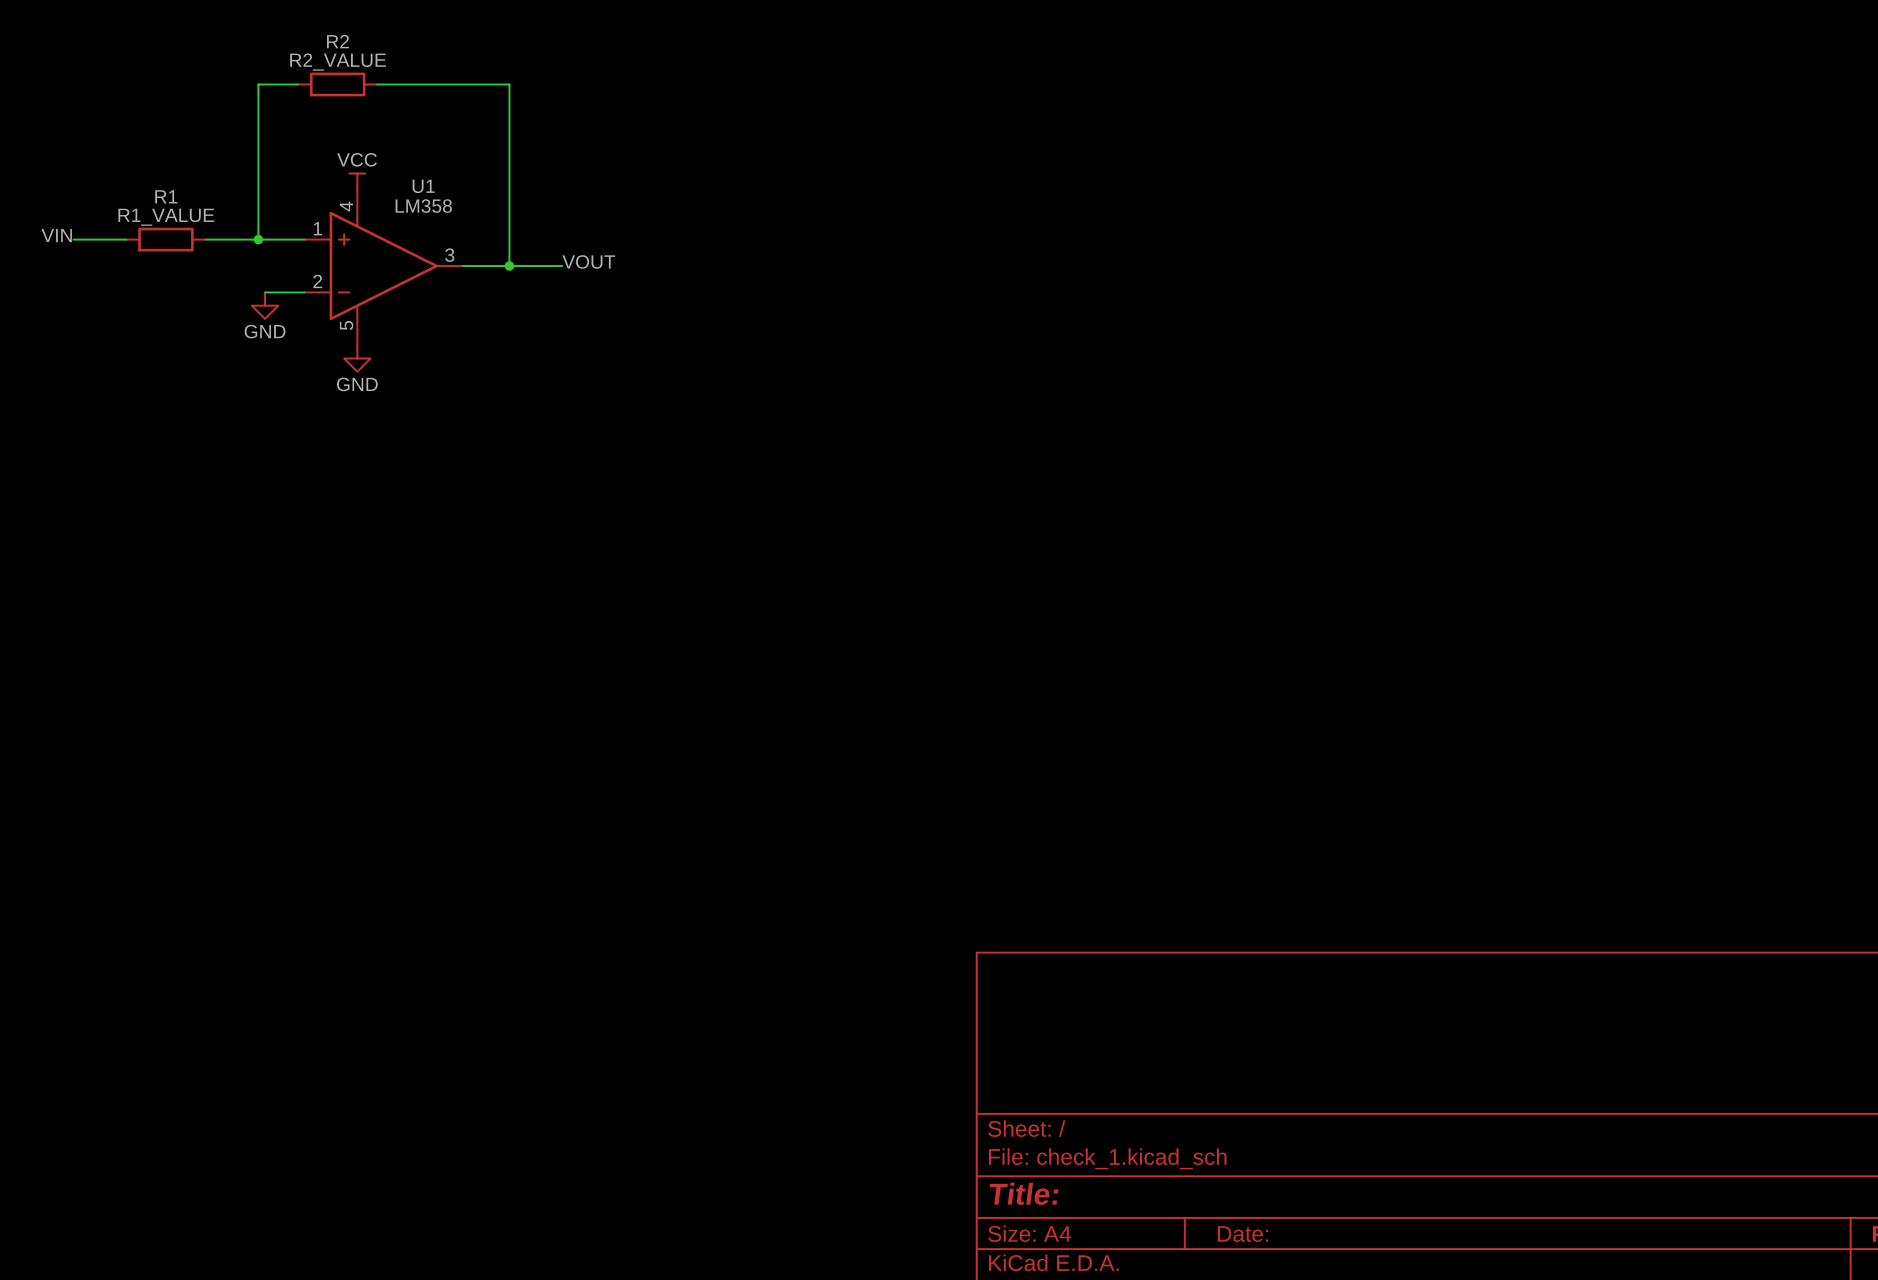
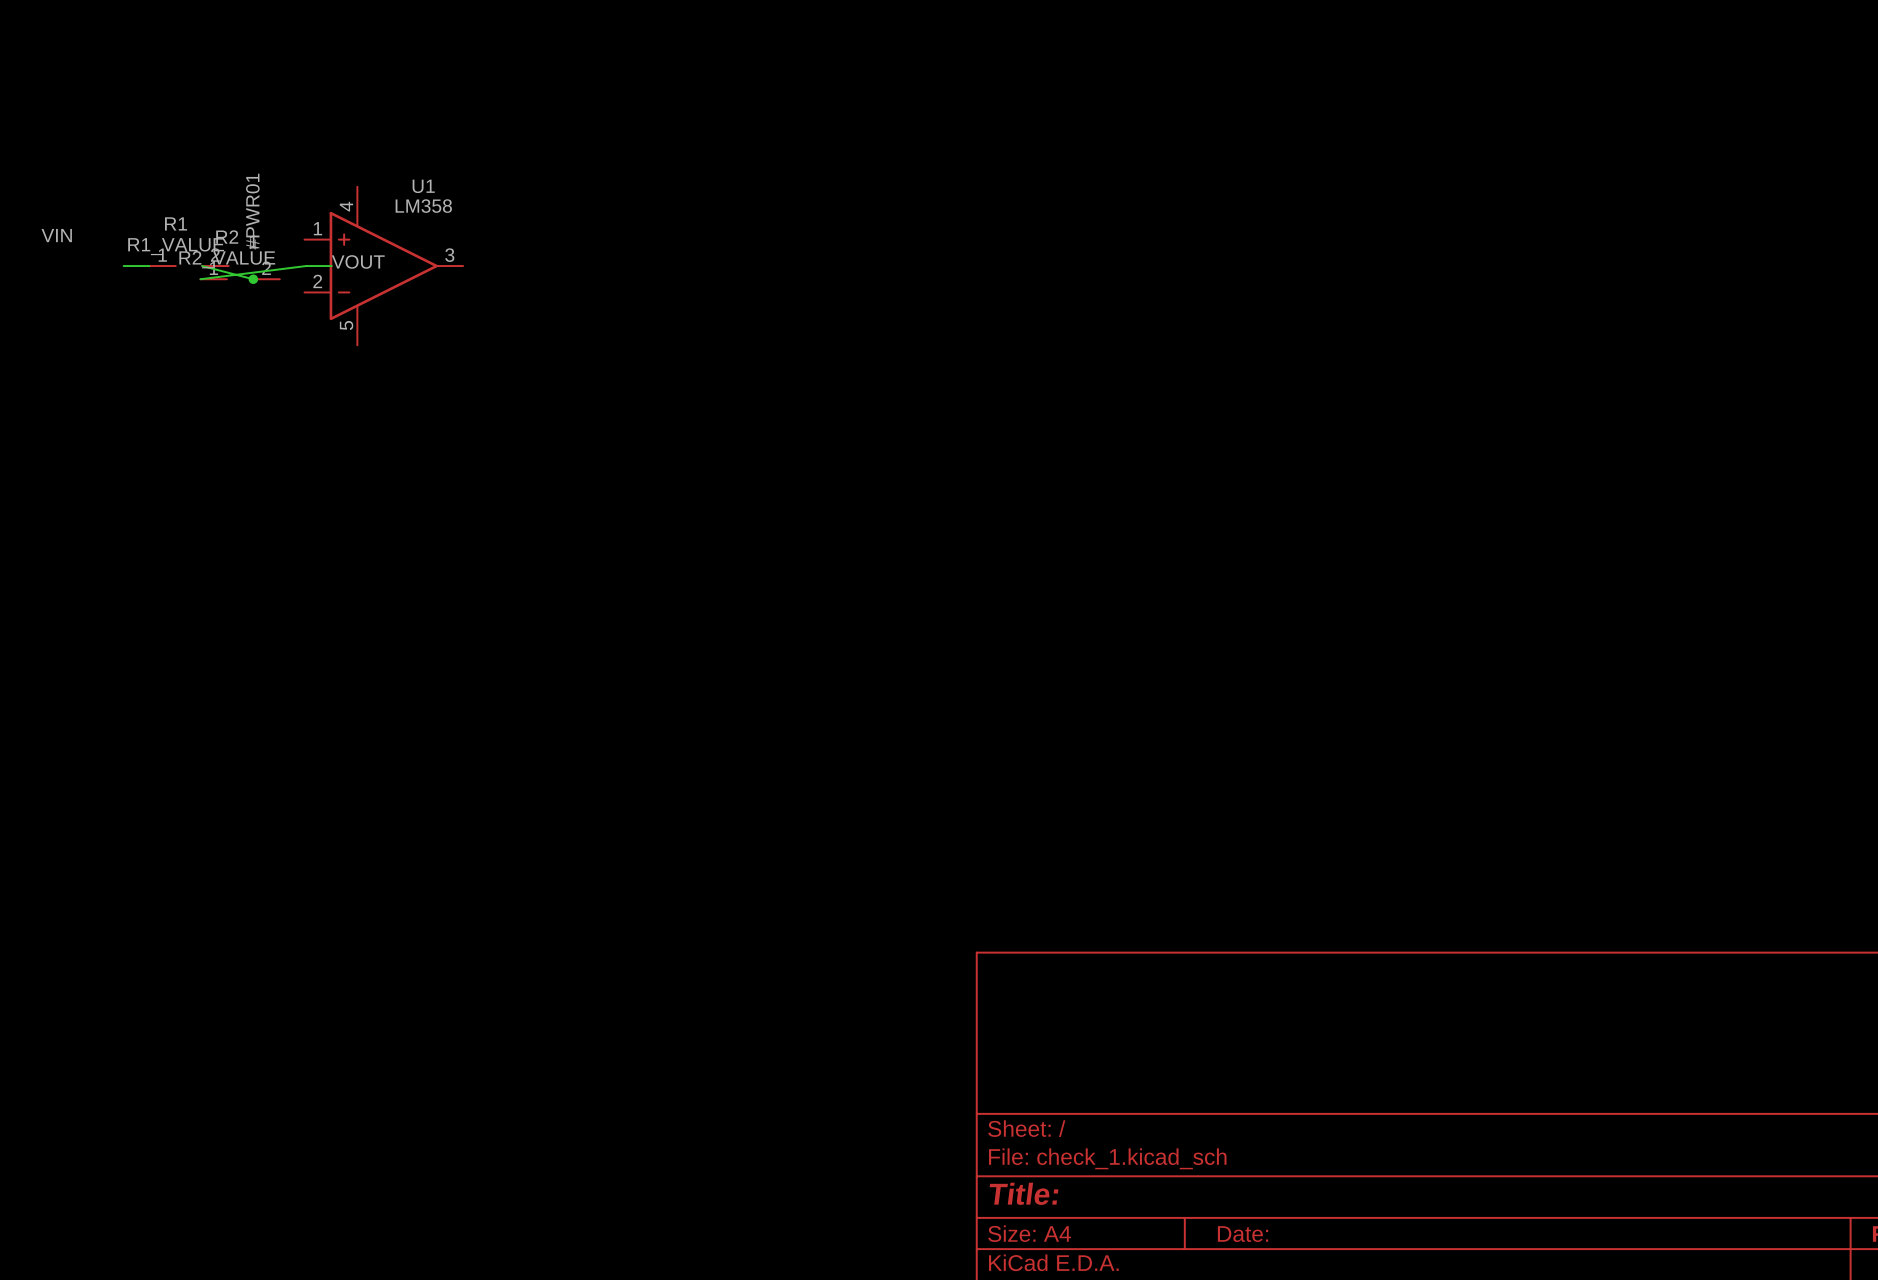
R2 symbol: [298, 72, 378, 97] -> [200, 279, 280, 280]
wire: (298, 84) (258, 84) (258, 239) -> none
wire: (377, 84) (509, 84) (509, 266) -> none
power symbol: VCC (357, 180) -> none
#PWR01: none -> (252, 211)
R1 symbol: [126, 227, 206, 252] -> [149, 266, 229, 267]
wire: (73, 239) (126, 239) -> none
wire: (205, 239) (304, 239) -> none
junction position: (258, 239) -> (253, 279)
label position: VOUT (588, 261) -> VOUT (358, 261)
wire: none -> (123, 266) (149, 266)
wire: none -> (202, 266) (253, 279)
wire: none -> (331, 266) (306, 266) (200, 279)
wire: (463, 266) (562, 266) -> none
junction: (509, 266) -> none
wire: (265, 292) (304, 292) -> none
power symbol: GND (265, 305) -> none
power symbol: GND (357, 358) -> none

